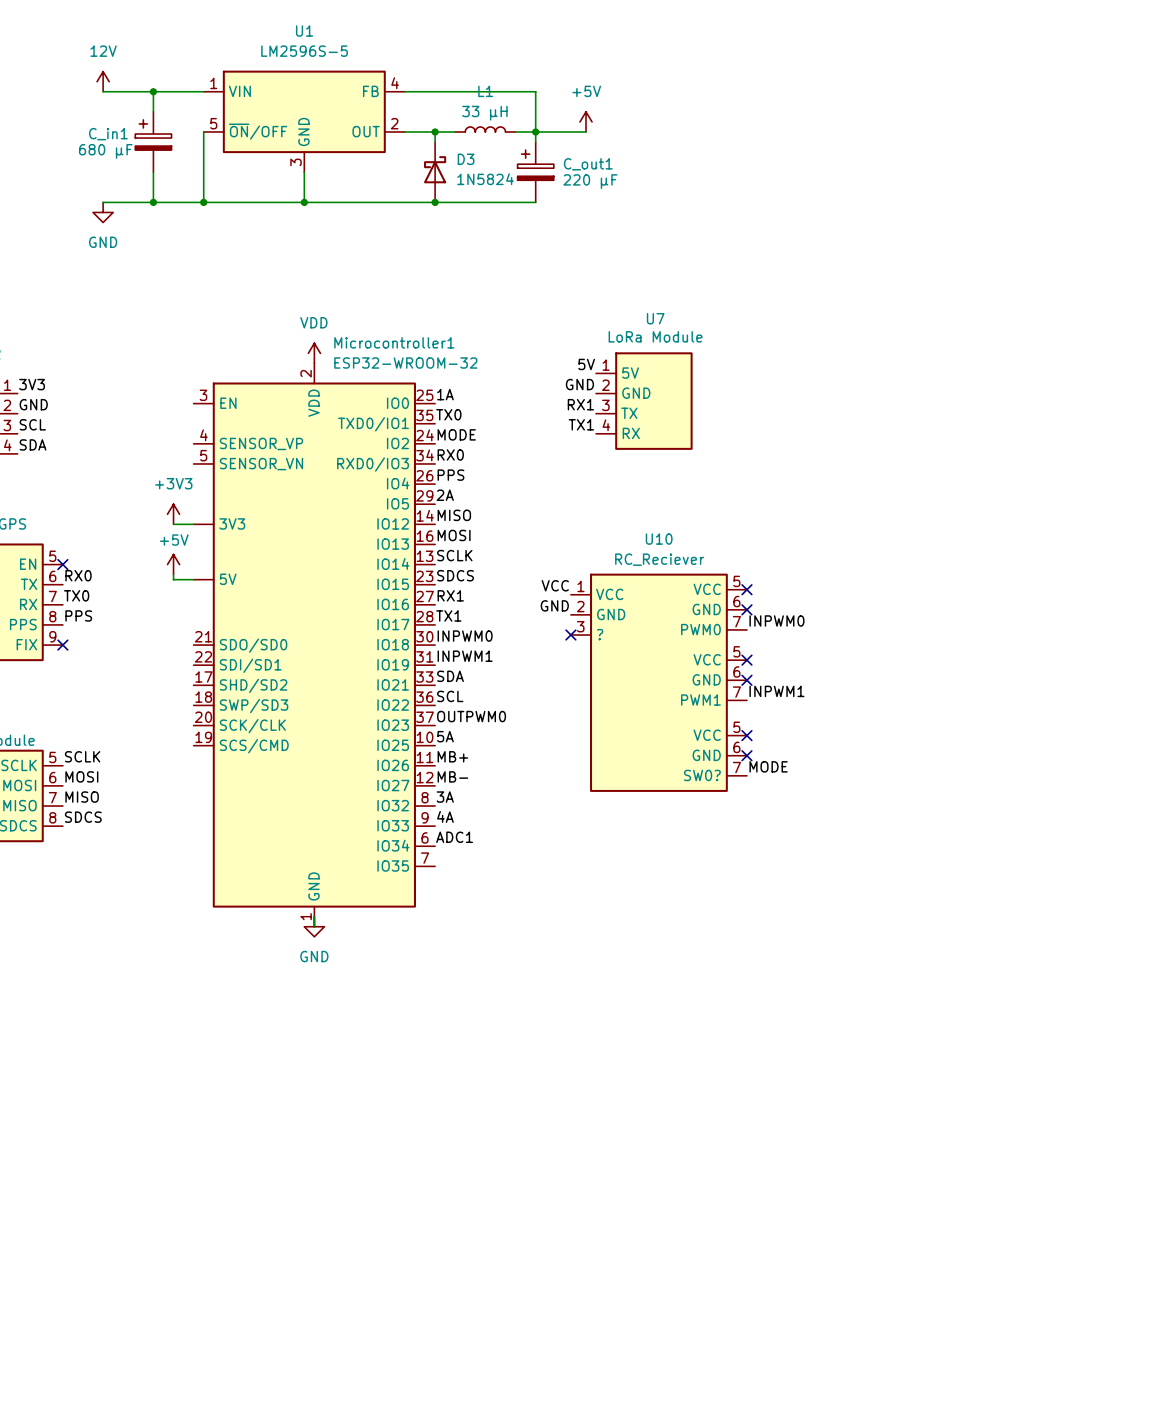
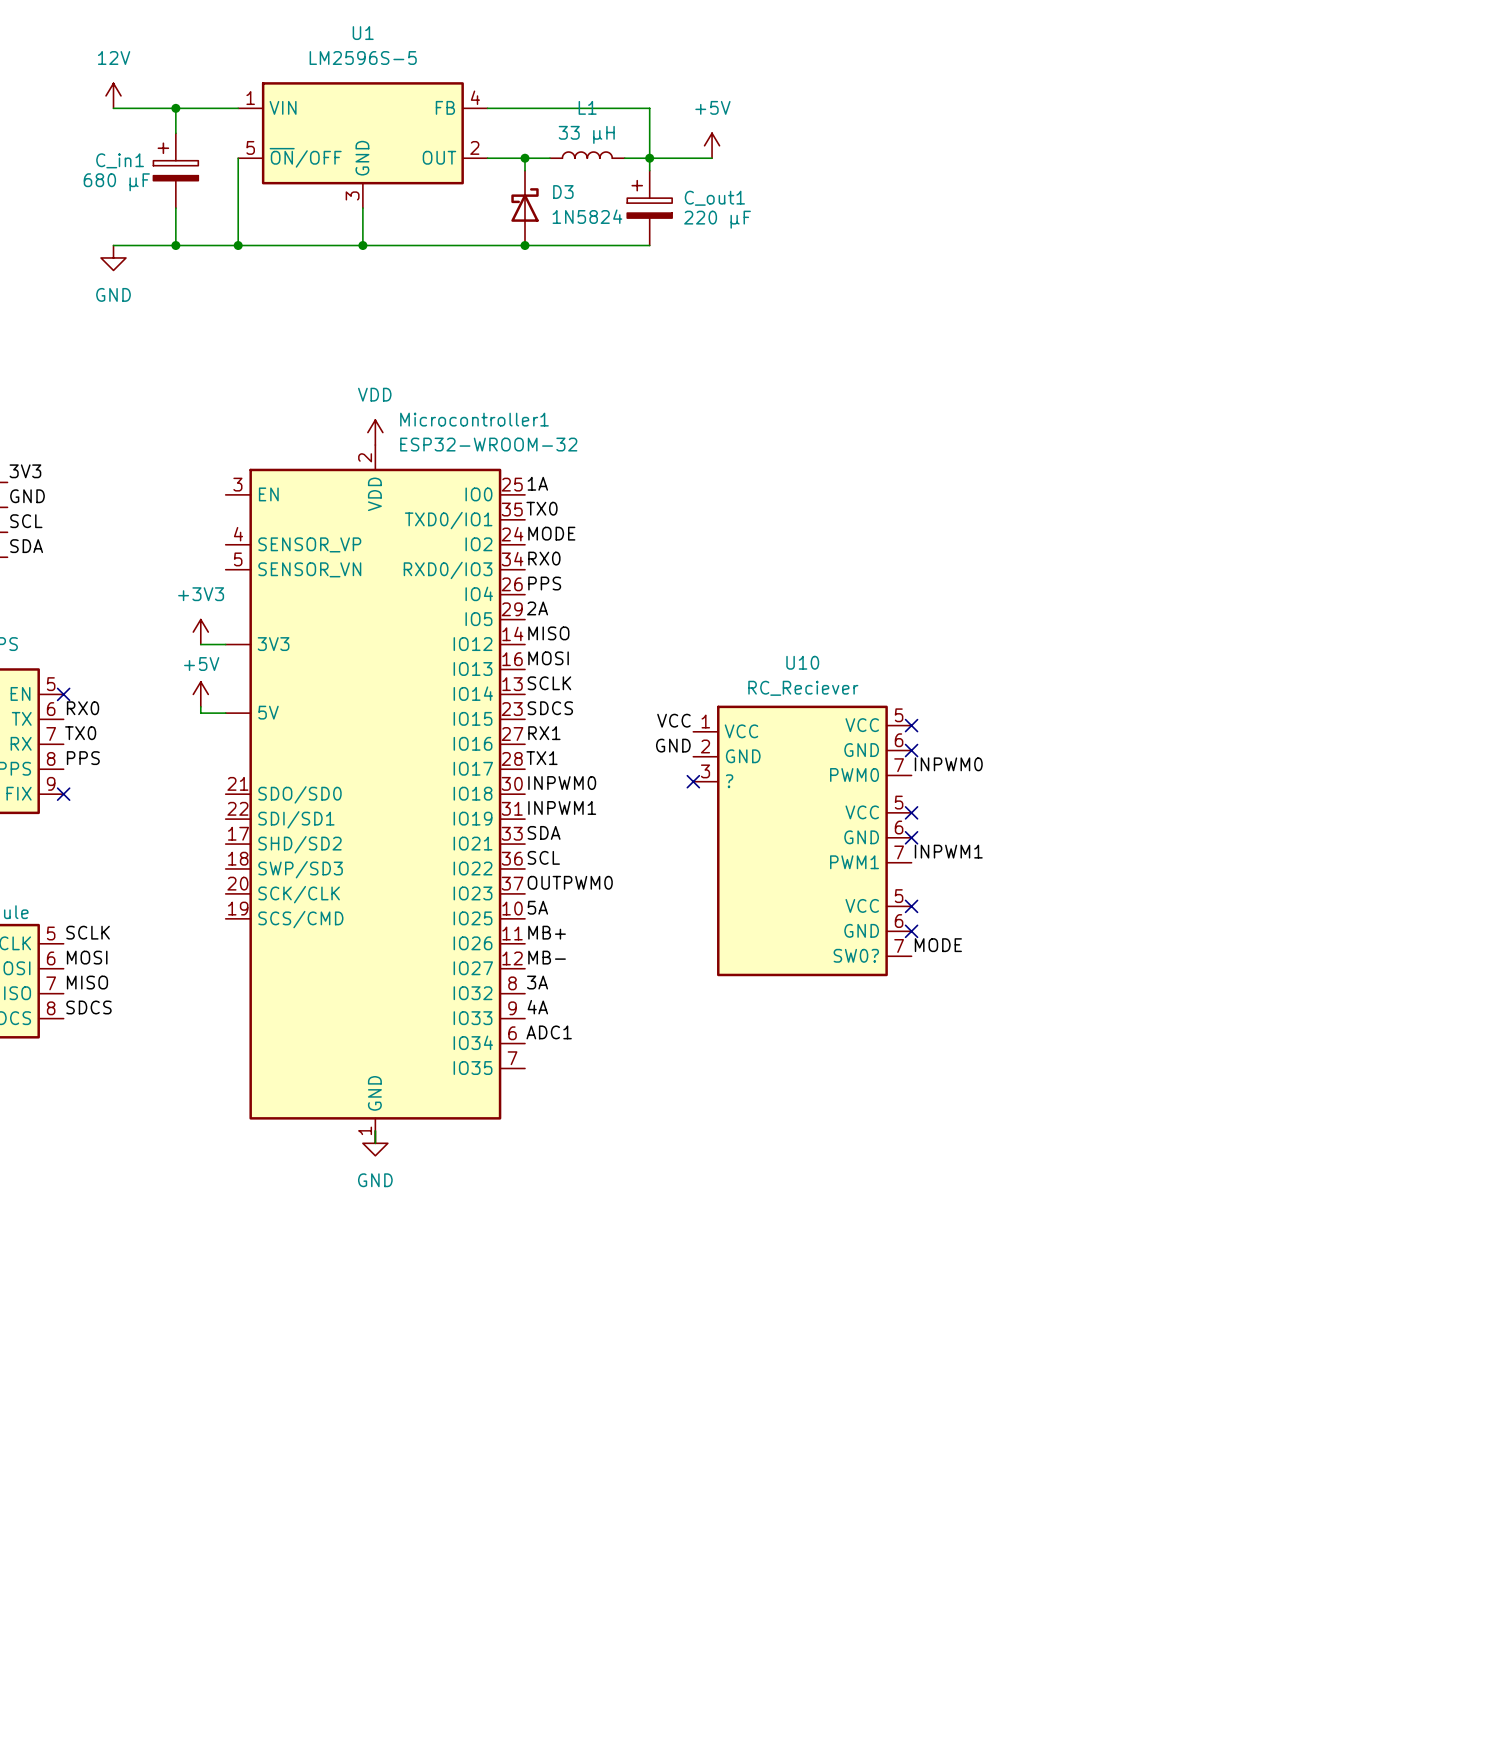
label: 5V (586, 364) -> none
label: GND (579, 384) -> none
U7: LoRa Module (644, 401) -> none
label: RX1 (580, 404) -> none
label: TX1 (581, 424) -> none

